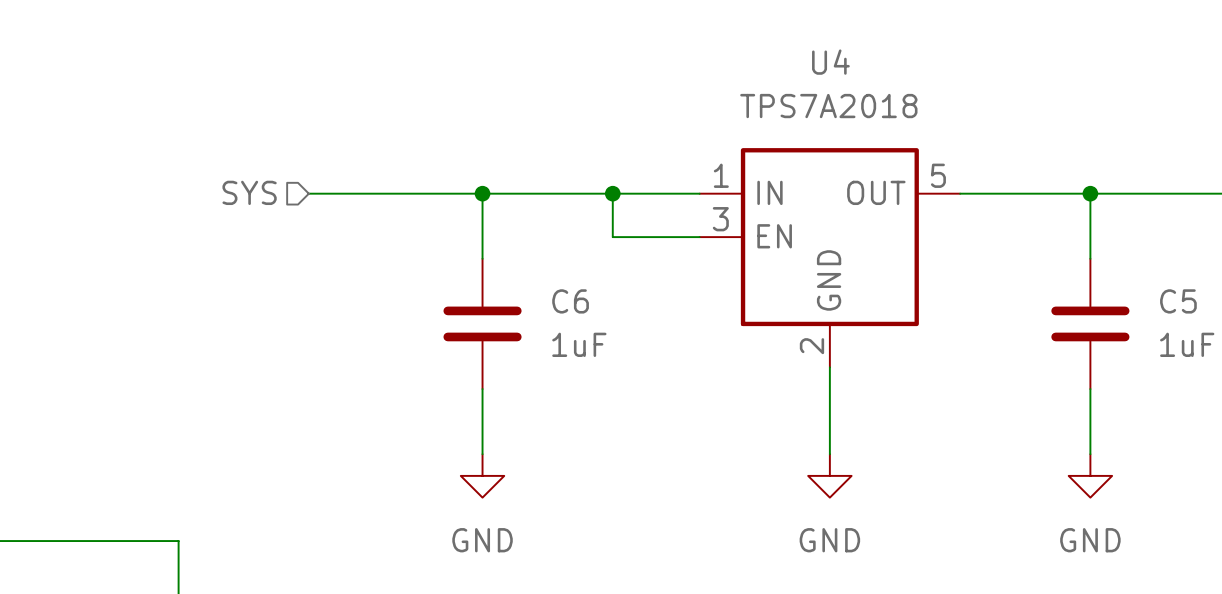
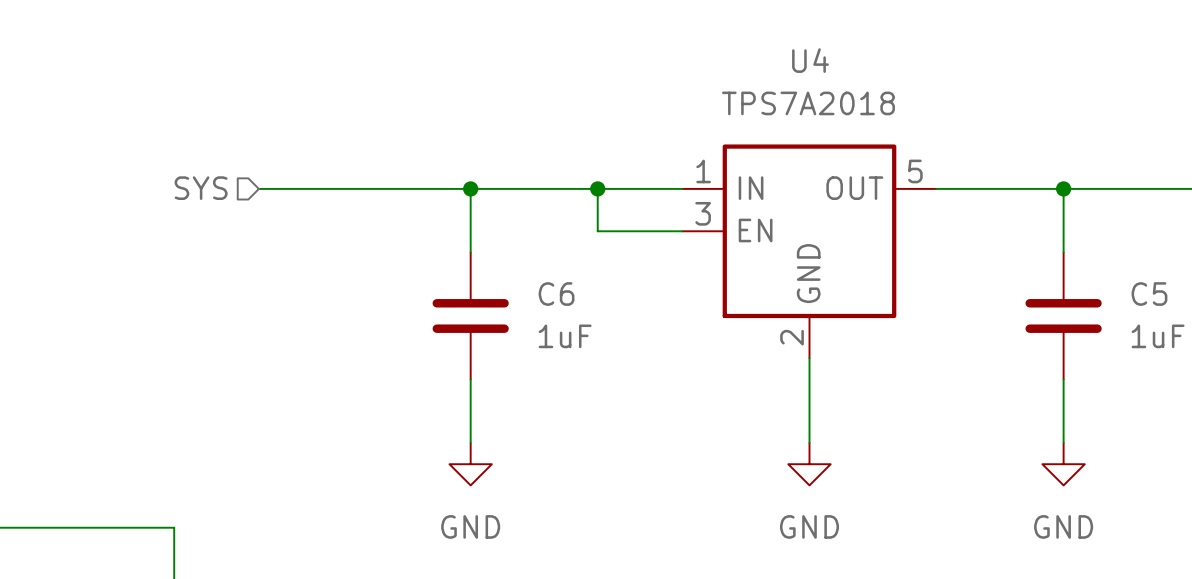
hierarchical label position: SYS (249, 192) -> SYS (201, 188)
wire: none -> (258, 188) (301, 188)

